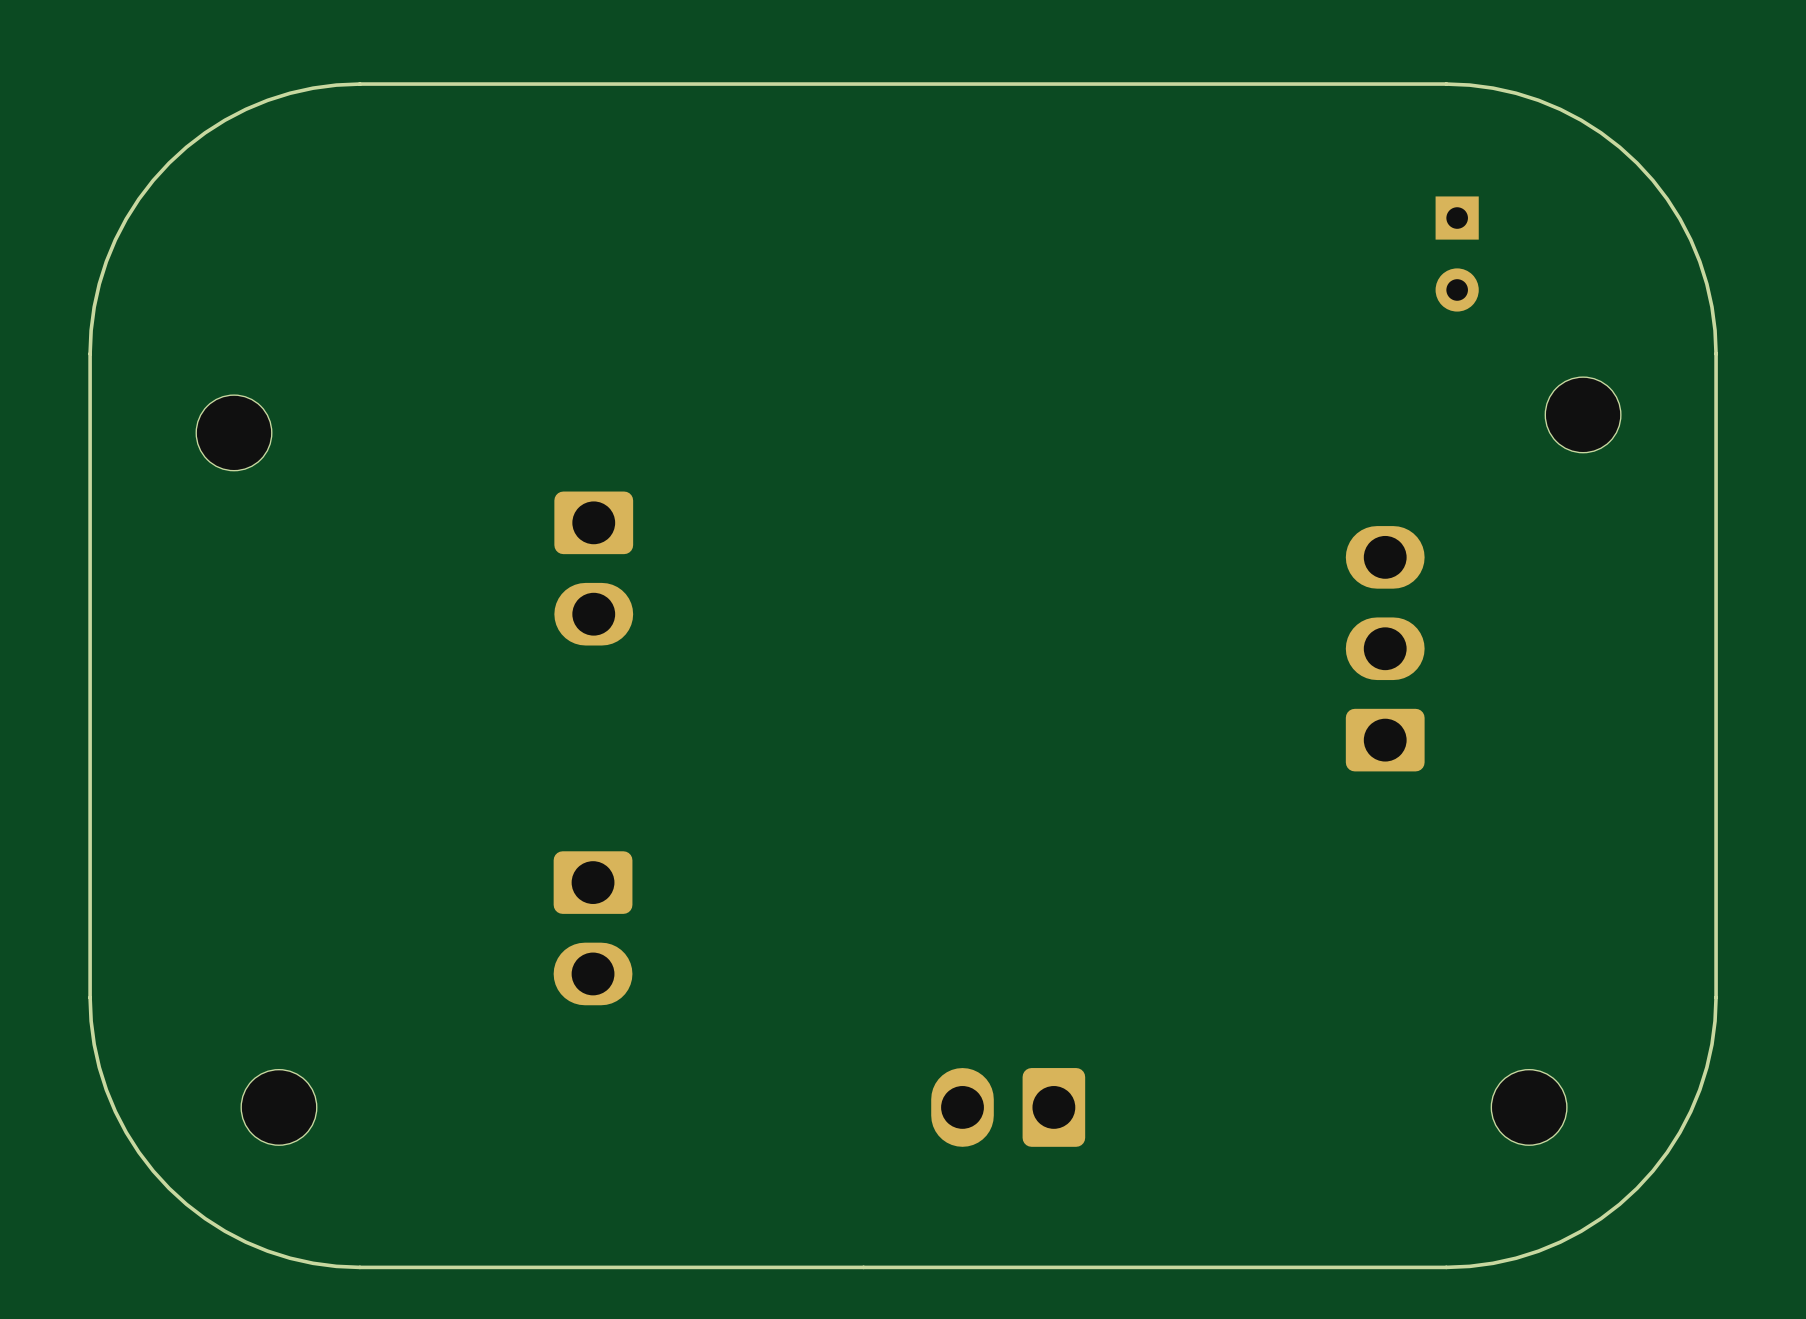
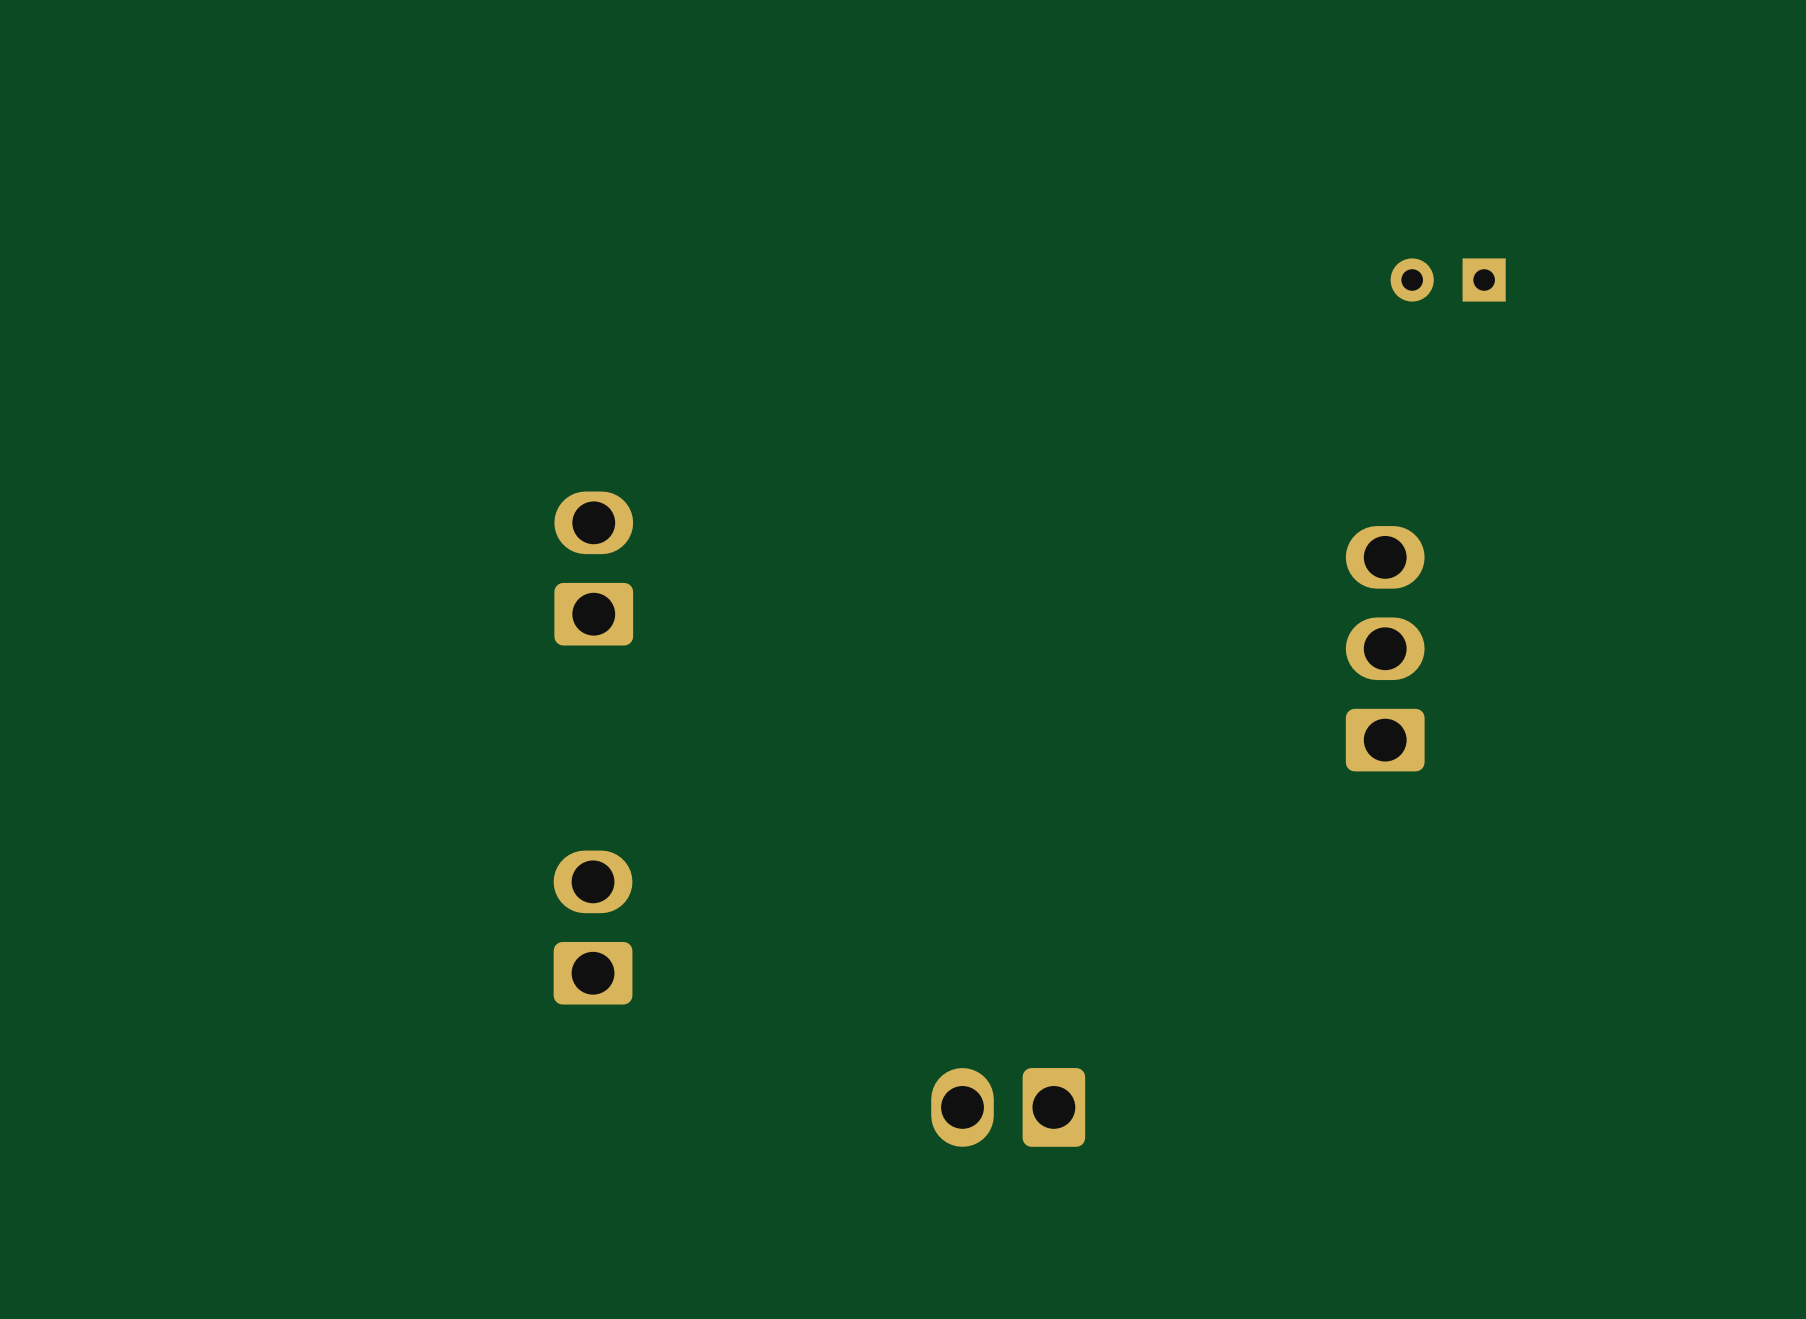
board edge: (1446, 84) (336, 85) (313, 88) (267, 100) (225, 120) (186, 147) (169, 163) (138, 199) (115, 239) (99, 284) (94, 307) (90, 353) (91, 1021) (99, 1067) (115, 1111) (126, 1132) (153, 1171) (186, 1204) (225, 1231) (245, 1242) (267, 1251) (313, 1263) (359, 1267) (1469, 1266) (1516, 1258) (1560, 1242) (1601, 1218) (1619, 1204) (1652, 1171) (1679, 1132) (1699, 1089) (1706, 1067) (1715, 1021) (1716, 353) (1711, 307) (1699, 261) (1679, 218) (1652, 180) (1619, 147) (1581, 120) (1538, 100) (1493, 88) (1446, 84) -> none
part rotation: 0° (1457, 254) -> 90° clockwise (1448, 280)
part: (1583, 414) -> none
part: (234, 432) -> none
part rotation: 0° (593, 568) -> 180° (593, 568)
part rotation: 0° (593, 928) -> 180° (593, 927)
part: (278, 1107) -> none
part: (1529, 1107) -> none

